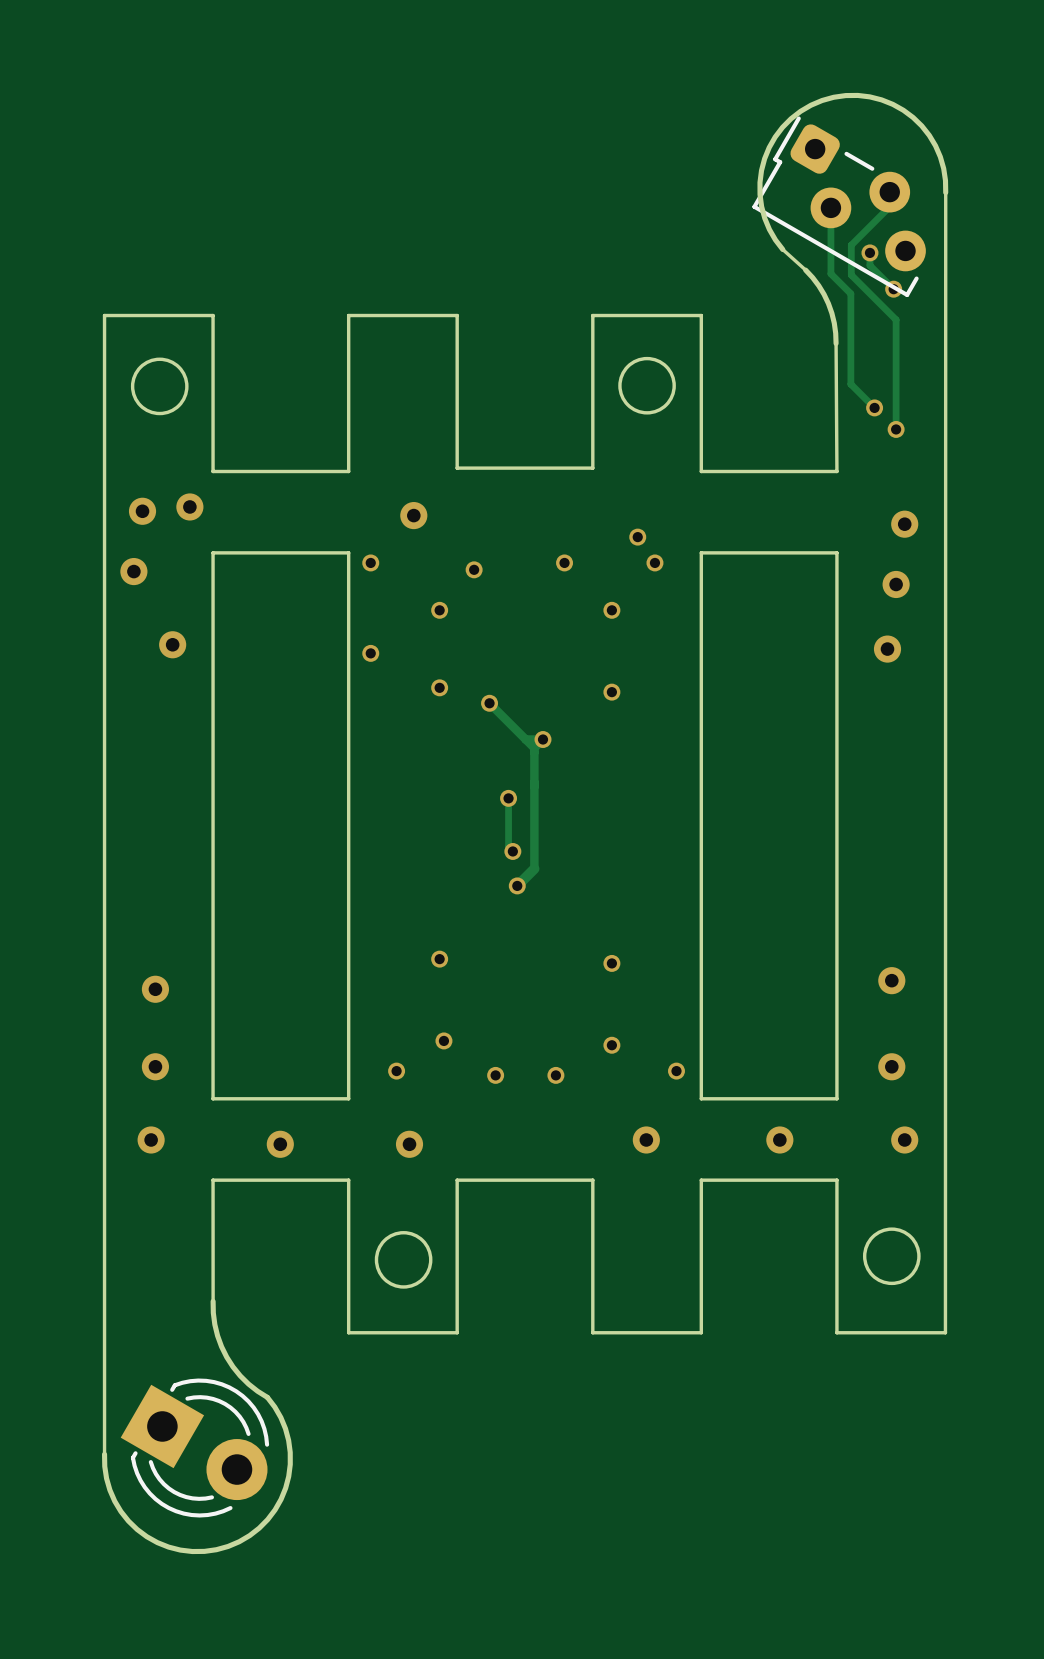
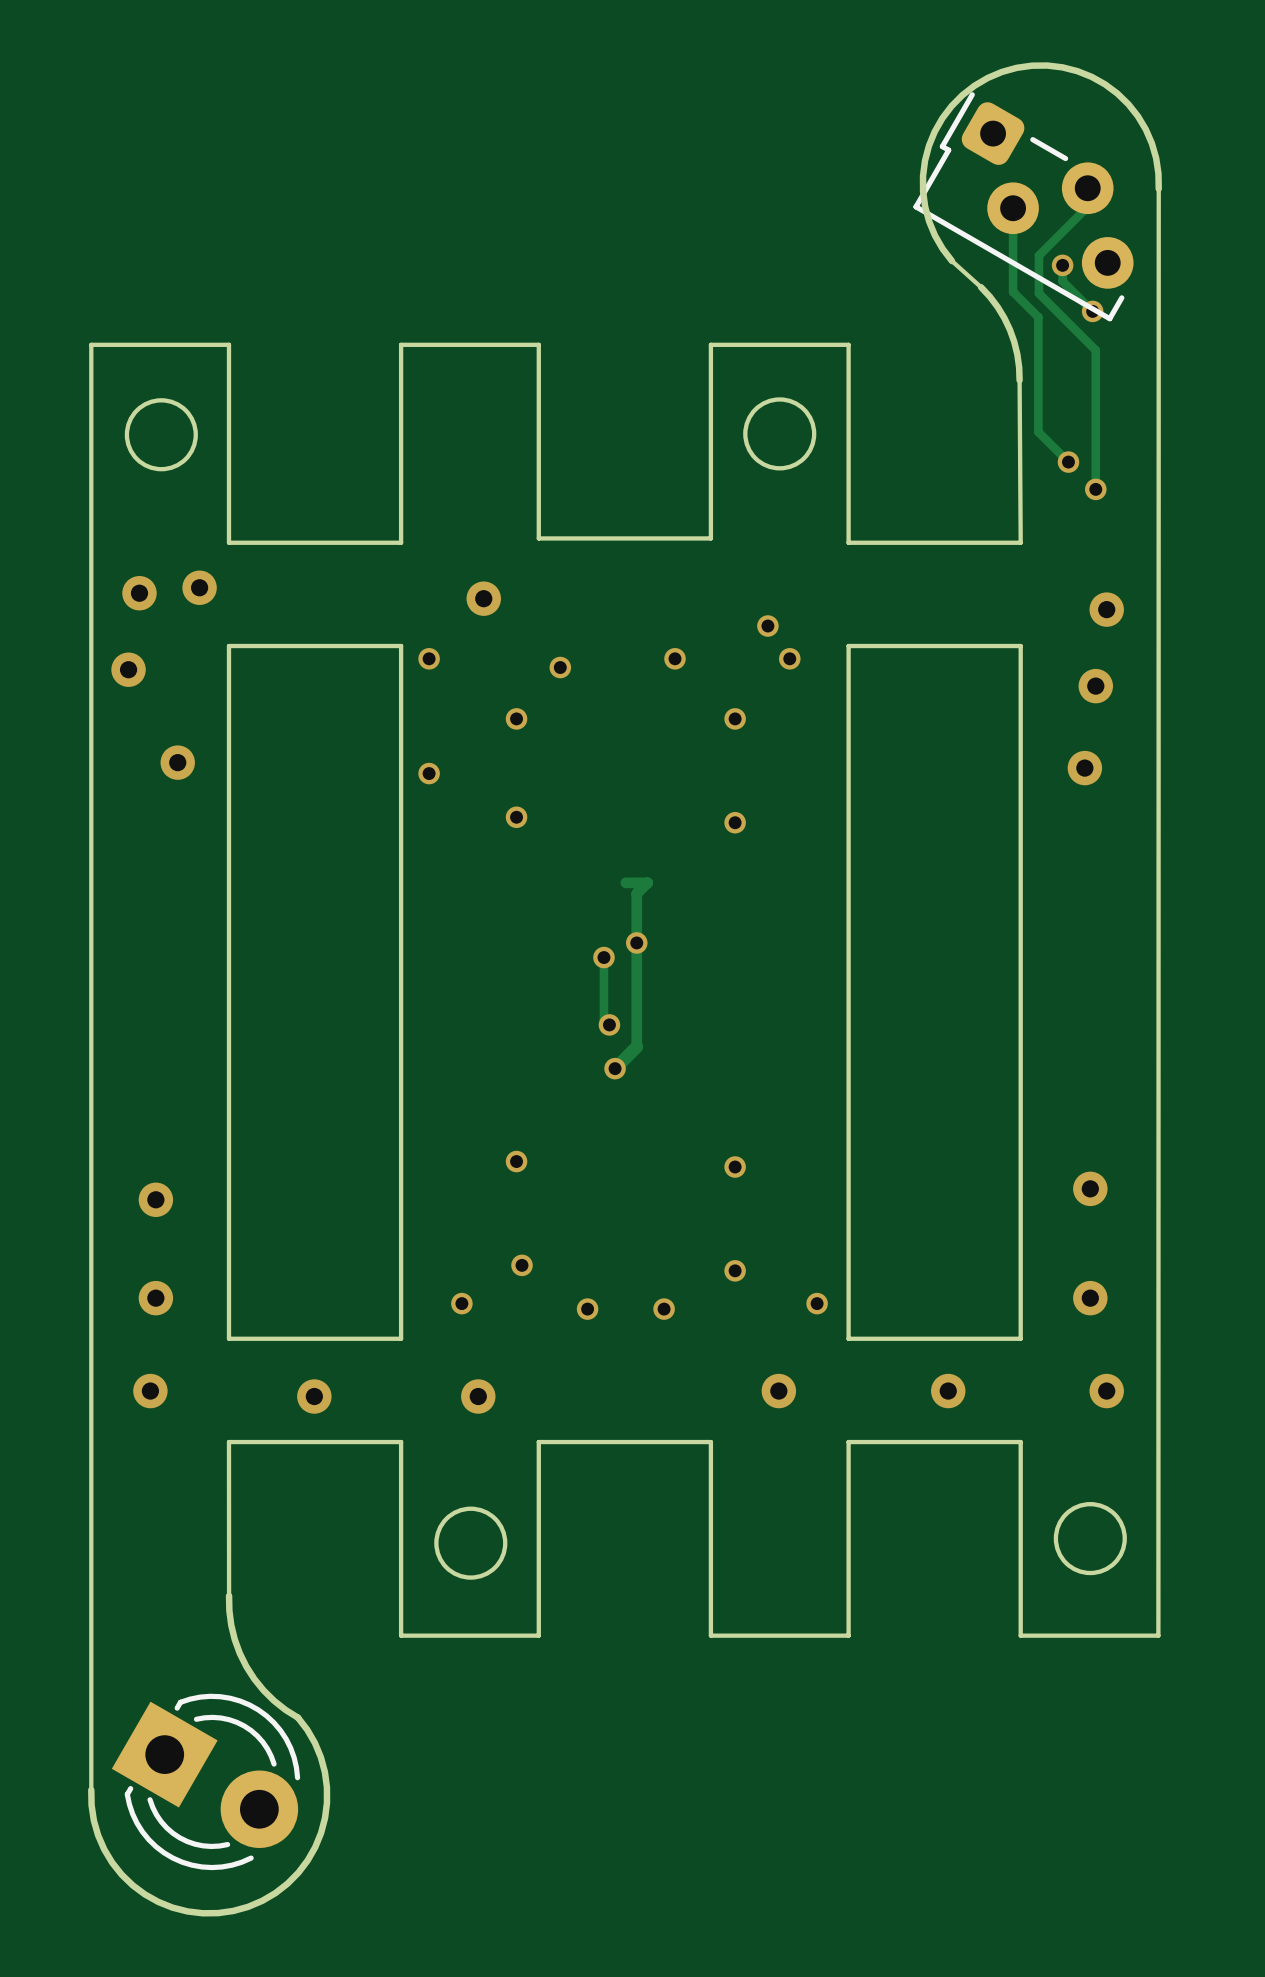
track: (489, 703) (534, 748) -> none
via: (489, 703) -> none
via: (543, 739) -> none
via: none -> (636, 942)

